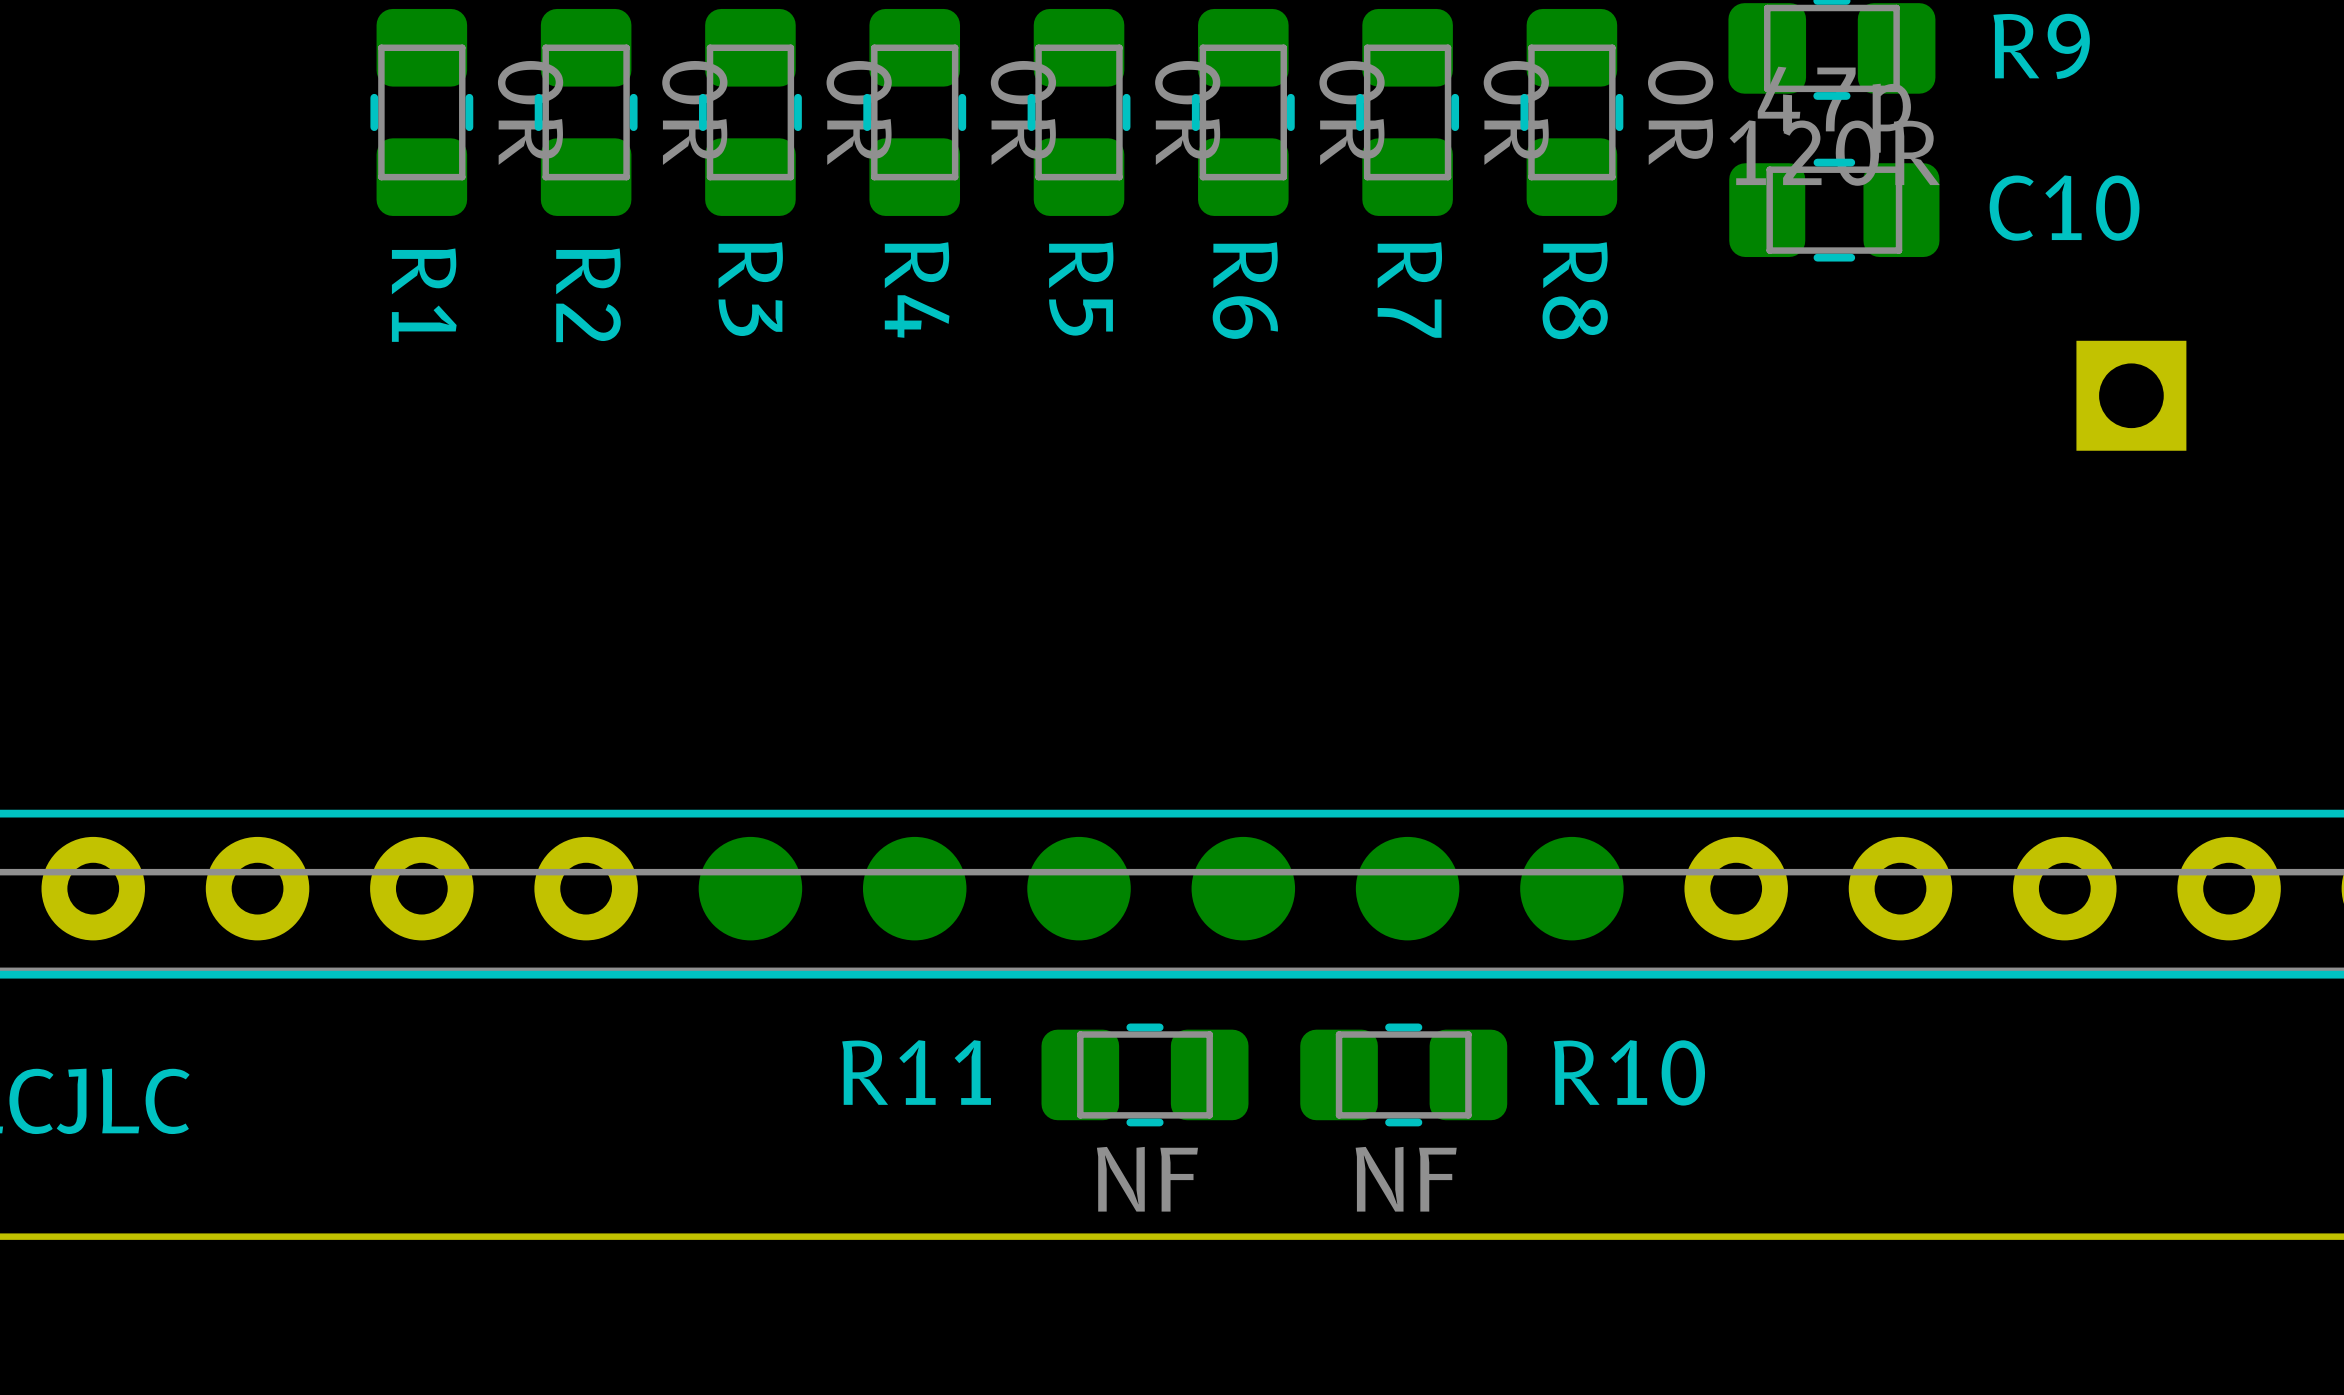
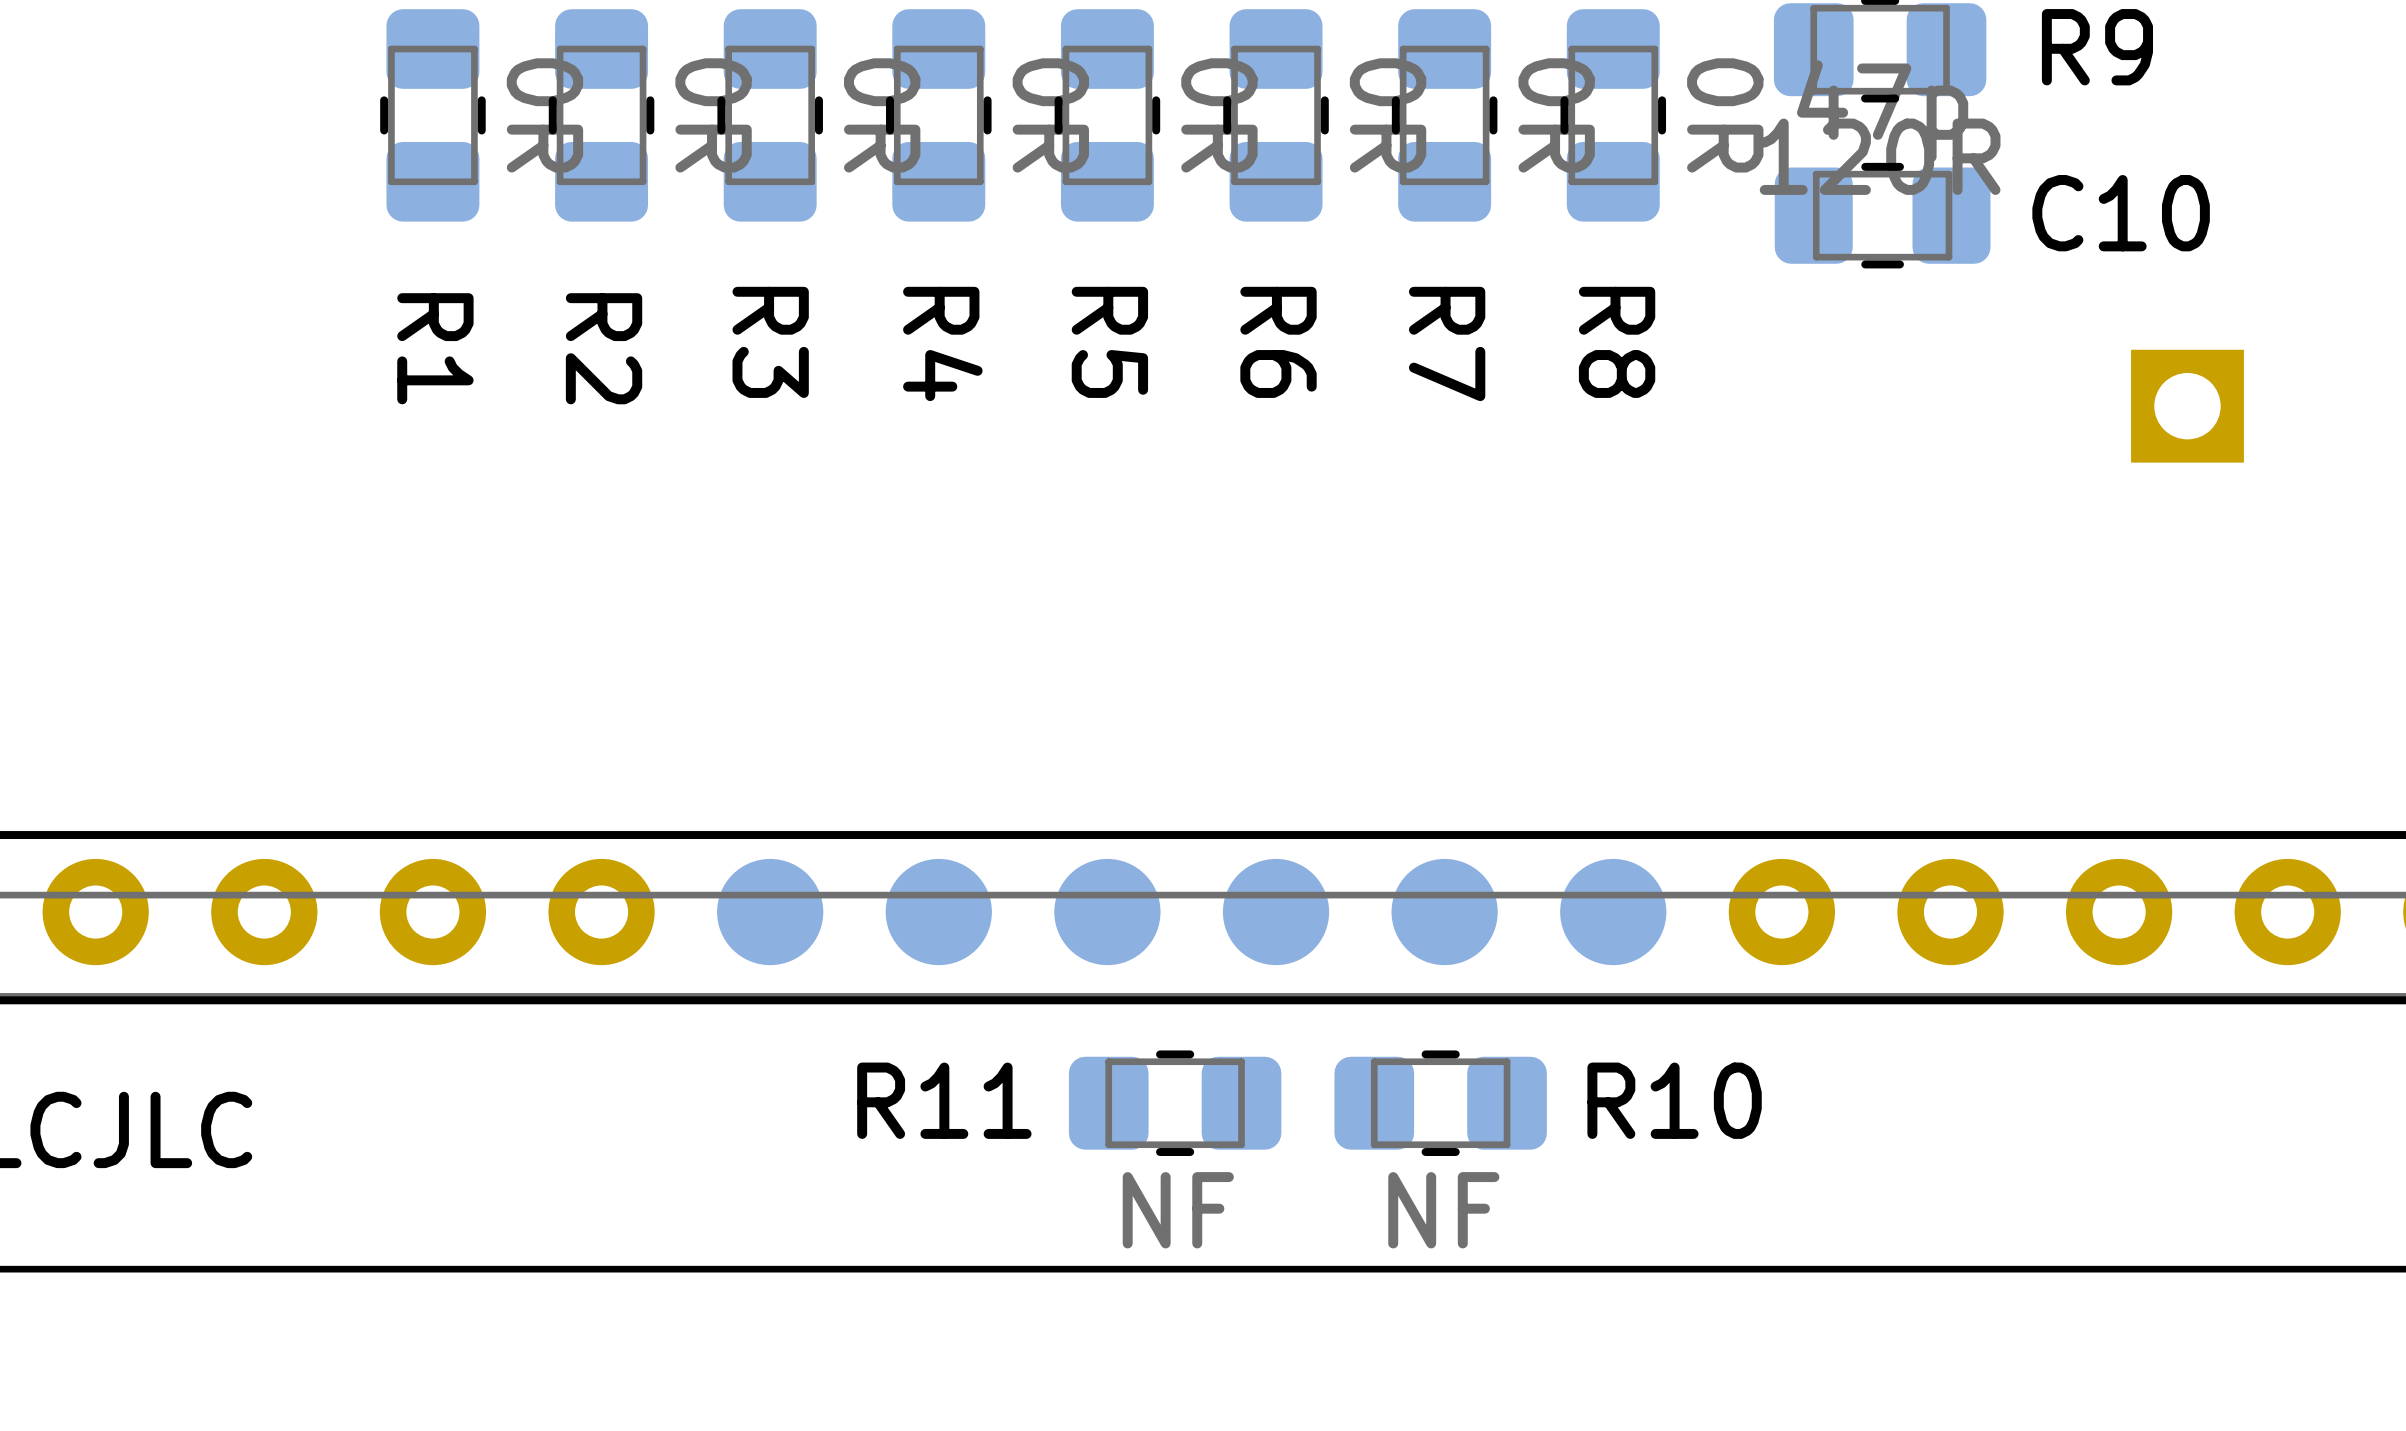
R5 name position: R5 (1081, 288) -> R5 (1109, 342)
R3 name position: R3 (750, 289) -> R3 (770, 342)
R4 name position: R4 (917, 290) -> R4 (942, 343)
R6 name position: R6 (1245, 290) -> R6 (1278, 342)
R7 name position: R7 (1409, 290) -> R7 (1447, 343)
R8 name position: R8 (1575, 290) -> R8 (1617, 342)
R1 name position: R1 (424, 295) -> R1 (435, 348)
R2 name position: R2 (588, 295) -> R2 (604, 348)

